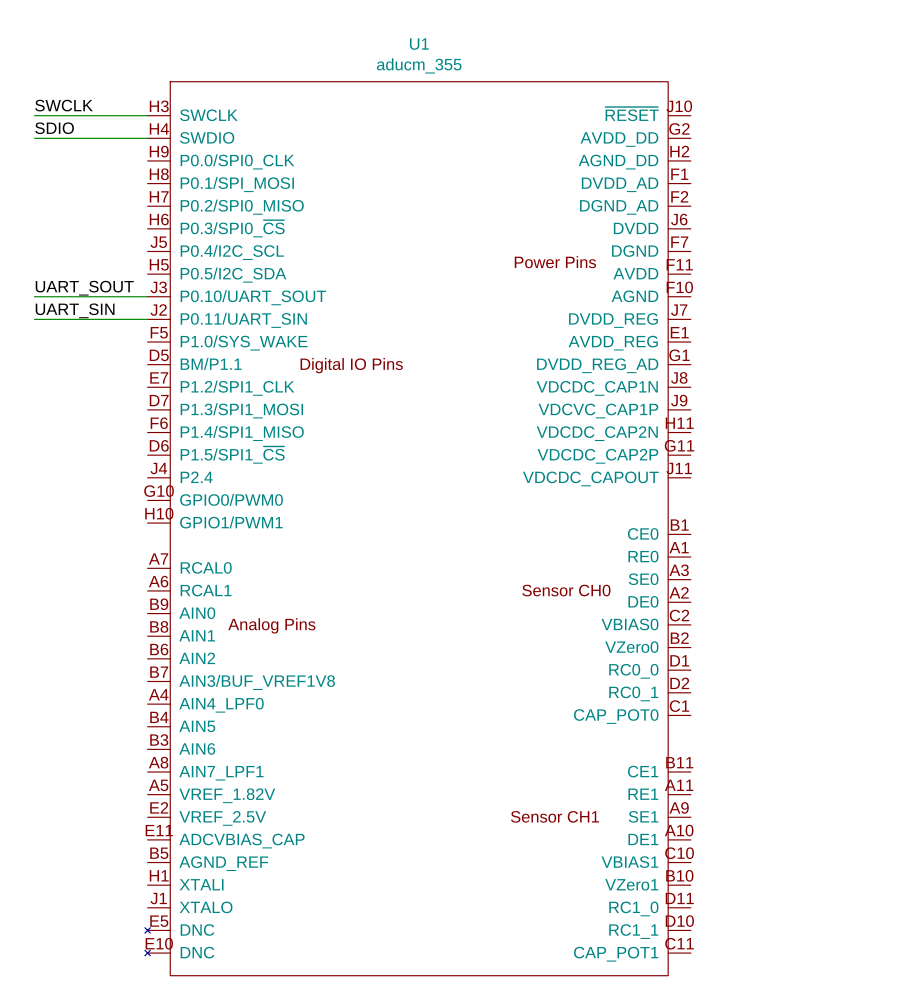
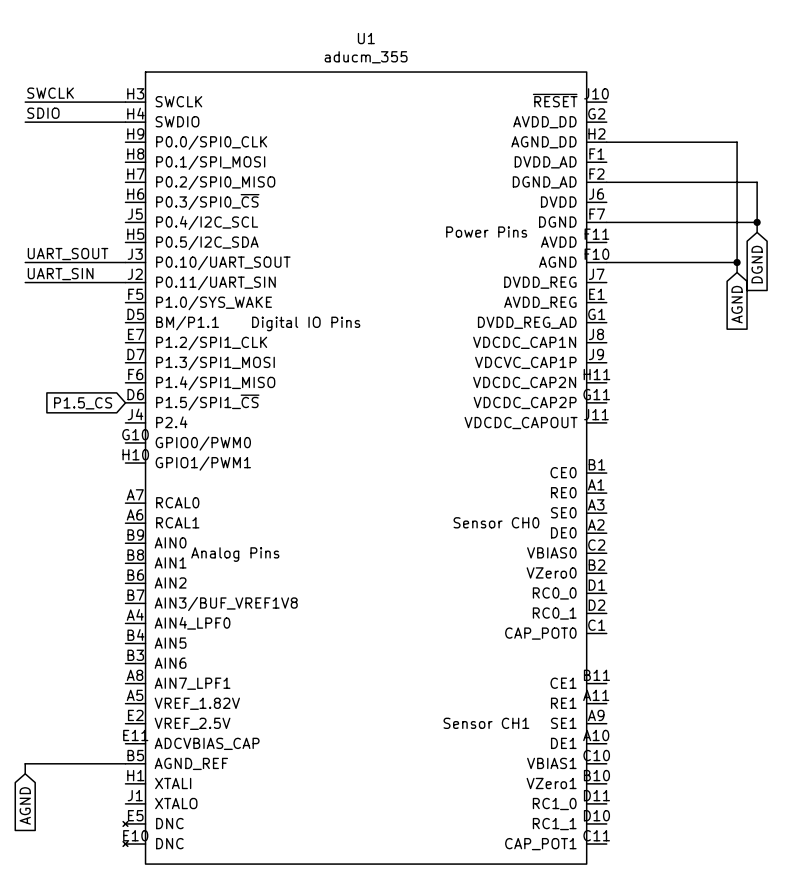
wire: none -> (606, 142) (737, 142) (737, 272)
wire: none -> (606, 182) (757, 182) (757, 232)
wire: none -> (606, 222) (757, 222)
junction: none -> (757, 222)
wire: none -> (606, 262) (737, 262)
junction: none -> (737, 262)
global label: none -> DGND (757, 264)
global label: none -> AGND (737, 304)
global label: none -> P1.5_CS (83, 403)
wire: none -> (125, 763) (25, 763) (25, 773)
global label: none -> AGND (25, 805)

